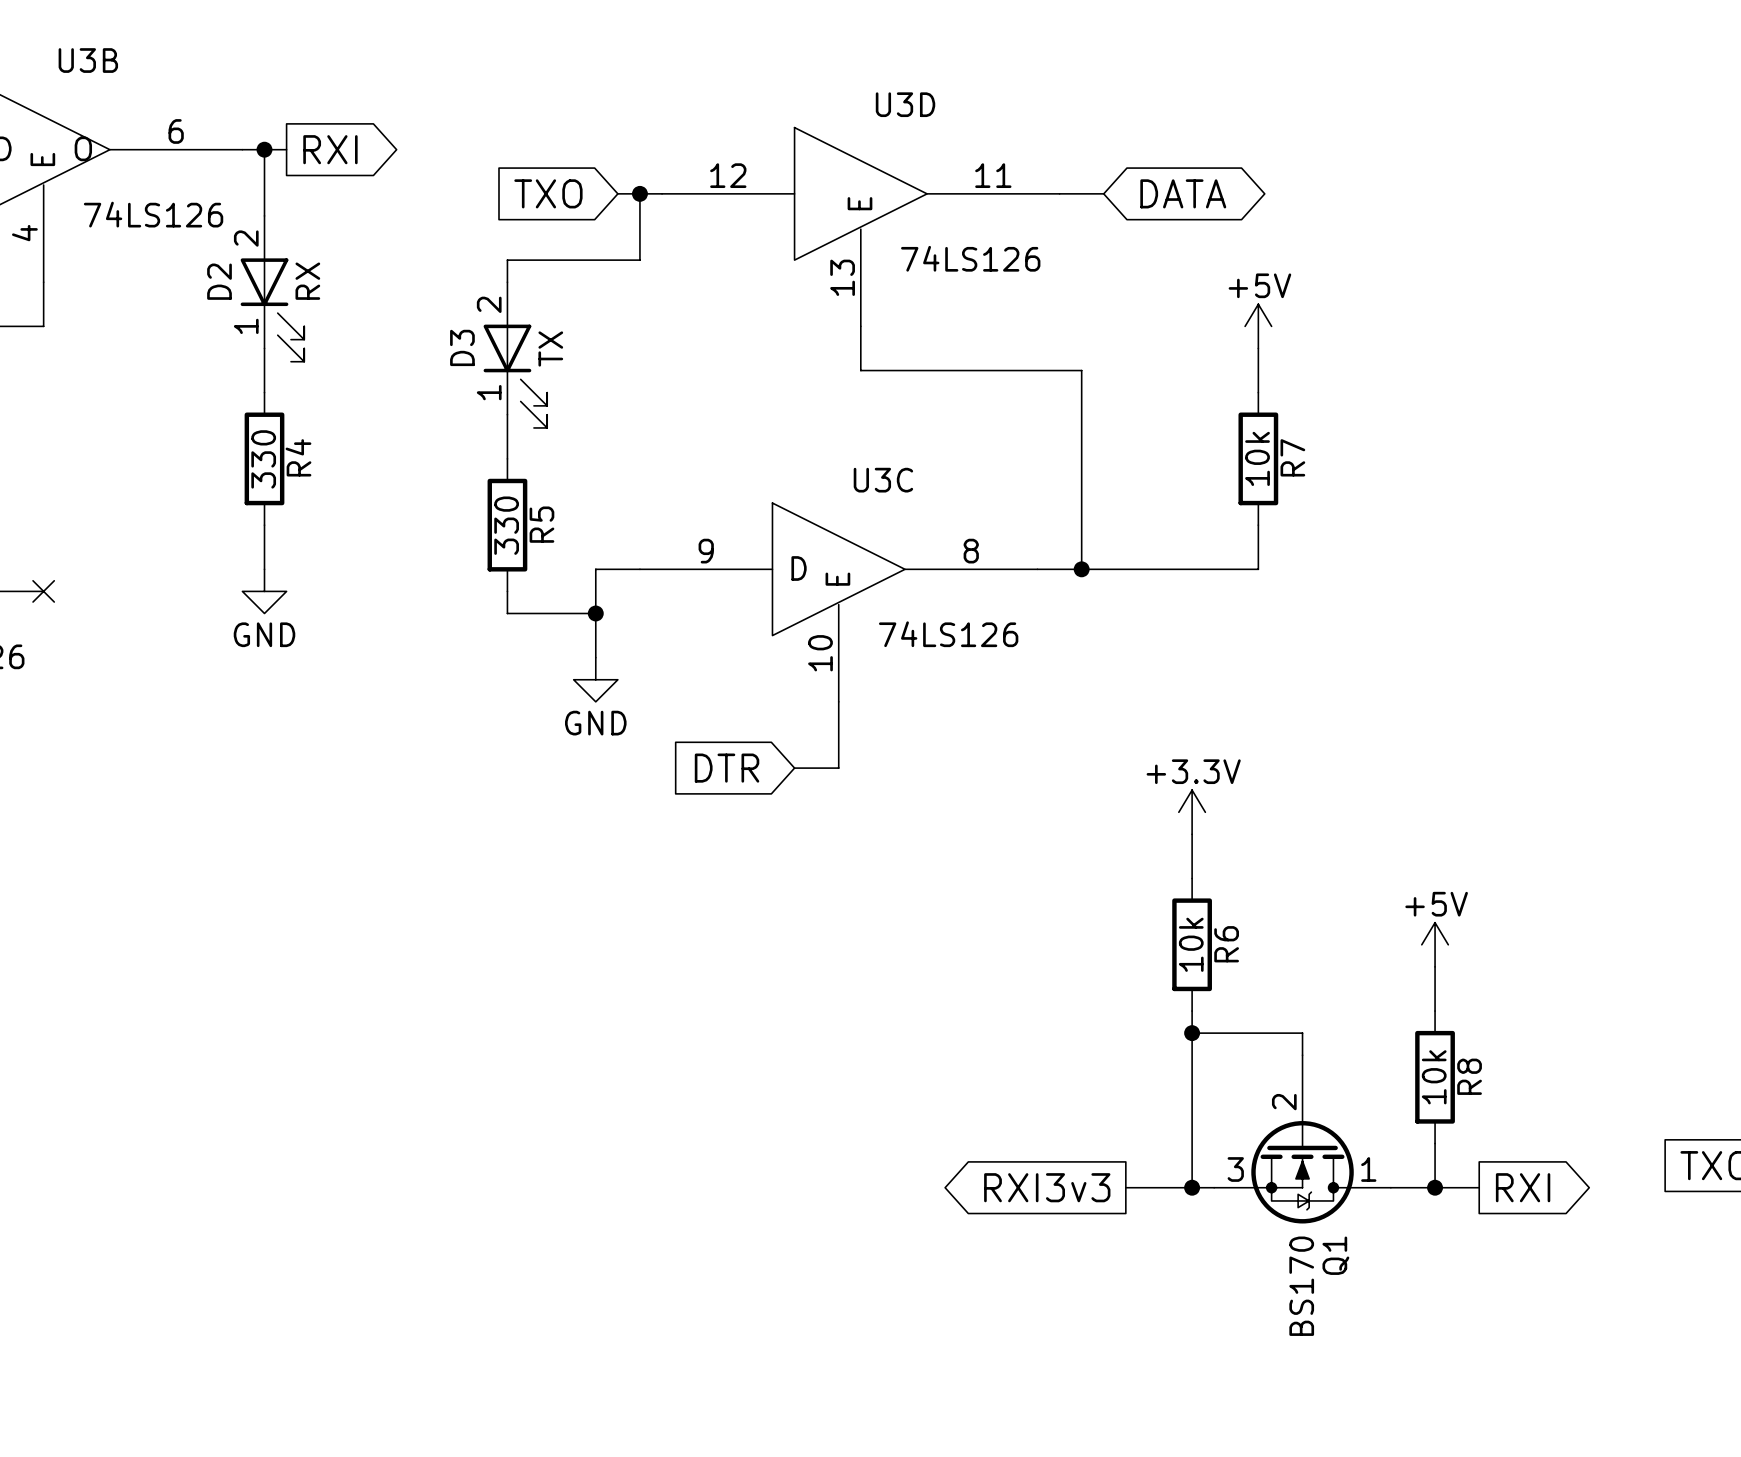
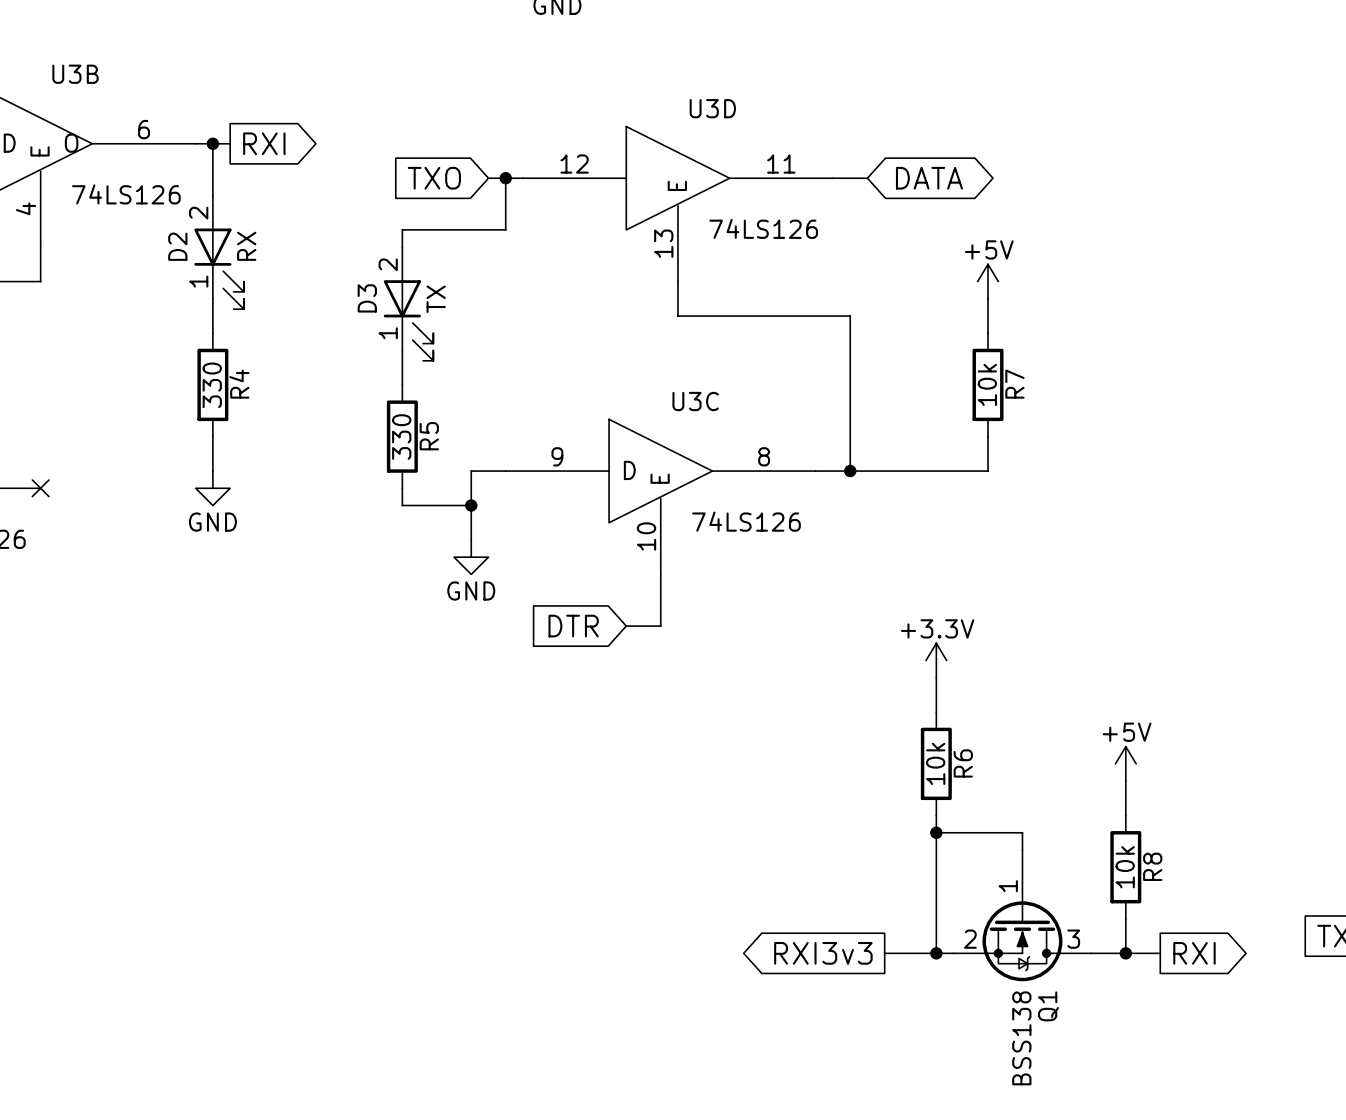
Q1 pin number: 2 (1284, 1102) -> 1 (1008, 886)
Q1 pin number: 3 (1235, 1169) -> 2 (970, 939)
Q1 pin number: 1 (1368, 1169) -> 3 (1073, 939)
Q1 value: BS170 (1301, 1286) -> BSS138 (1021, 1038)

